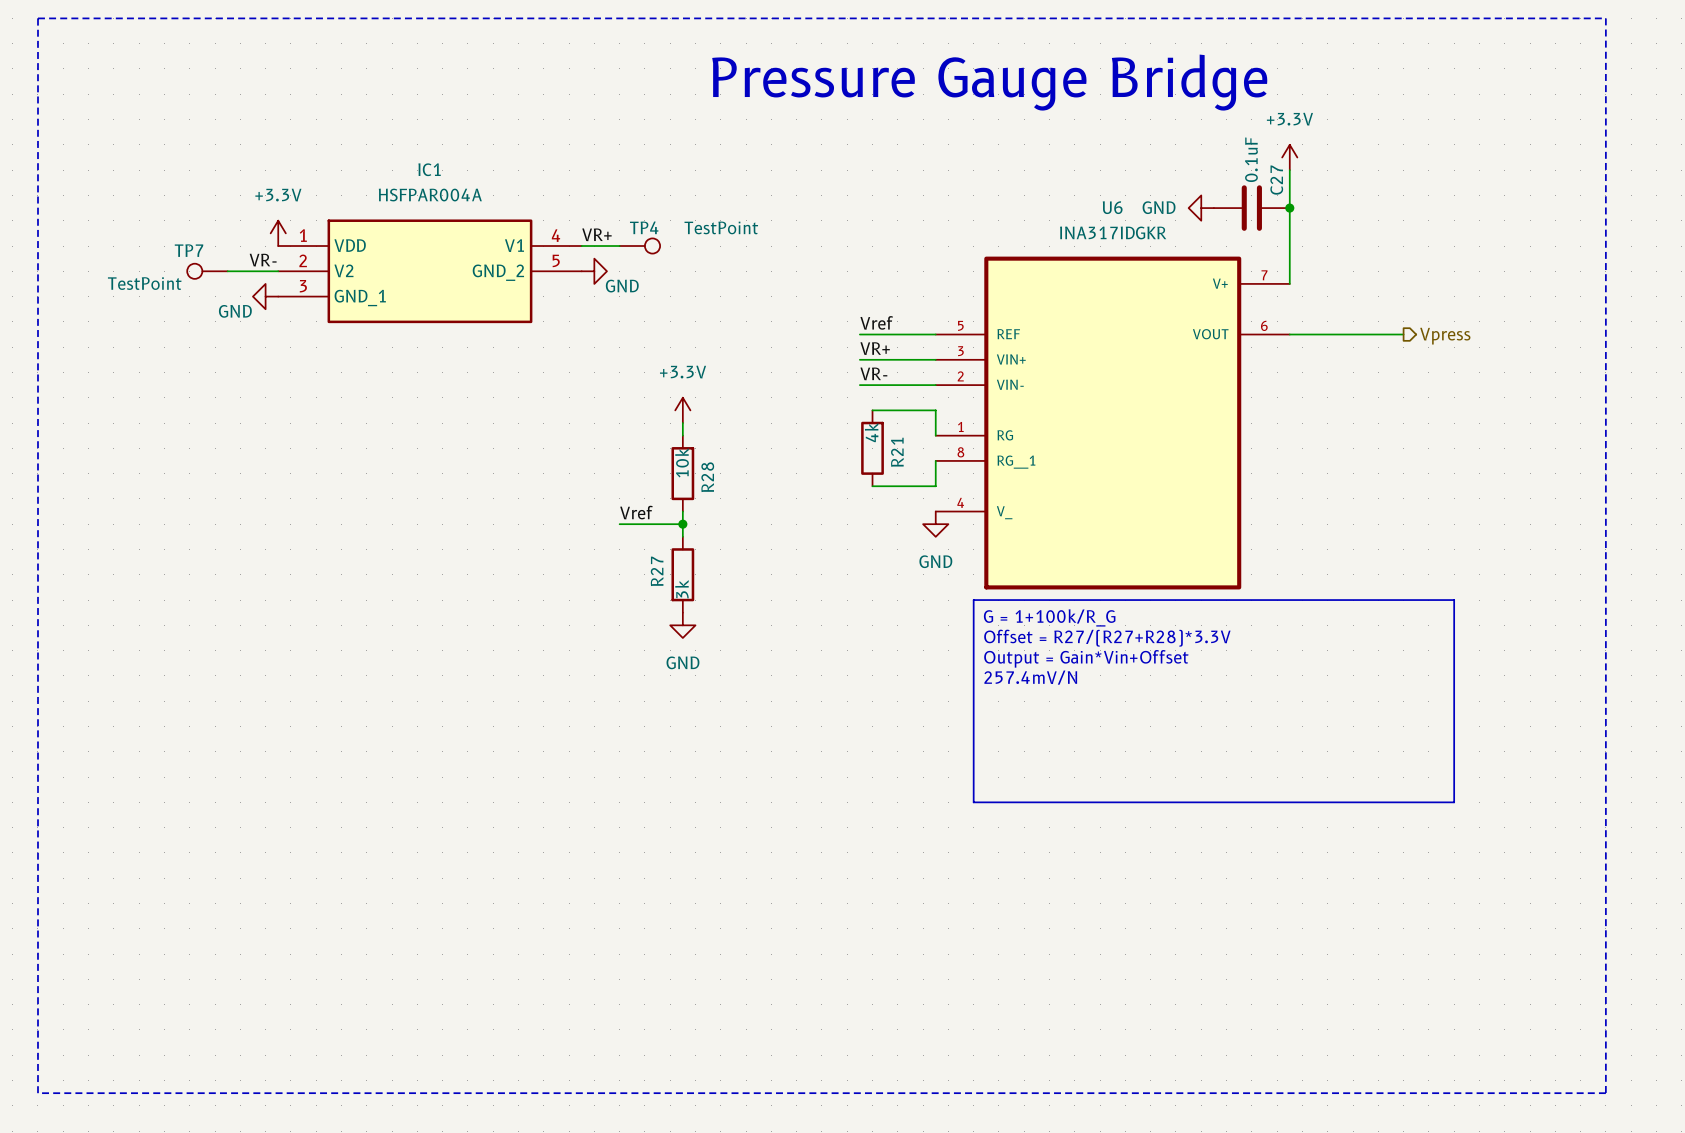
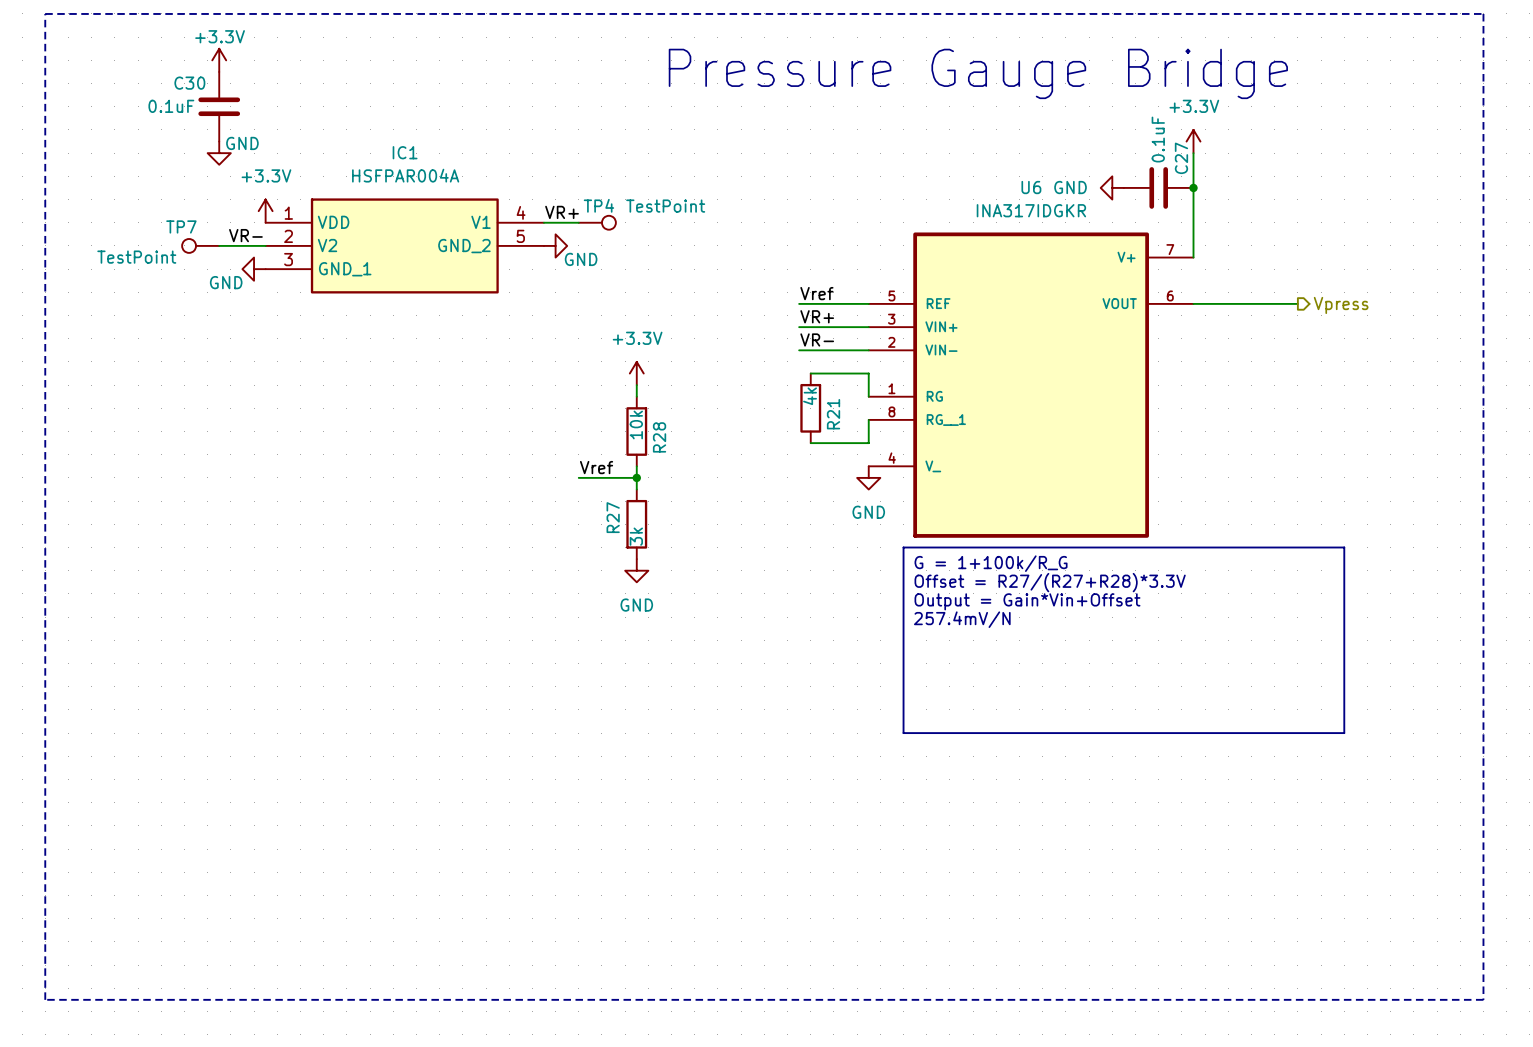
power symbol: none -> +3.3V (219, 60)
C30: none -> 0.1uF (219, 106)
power symbol: none -> GND (219, 153)

